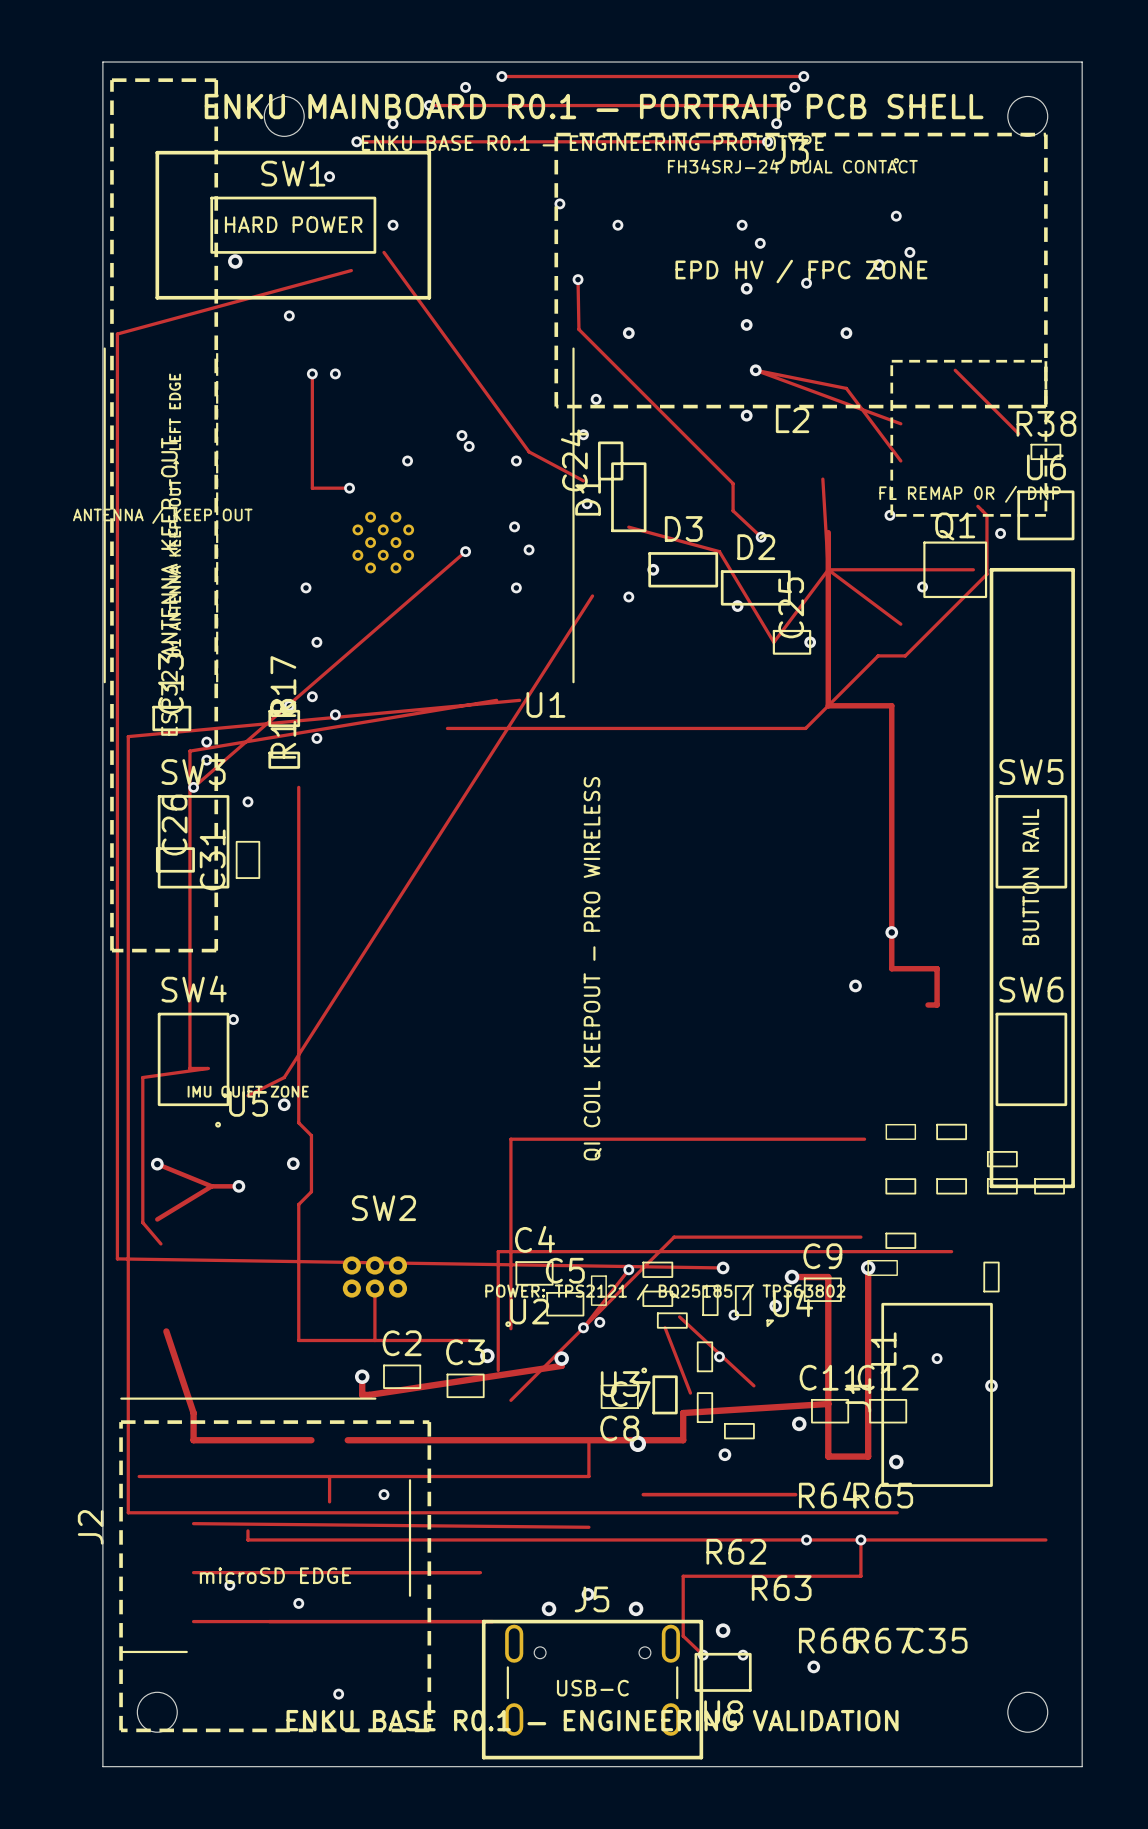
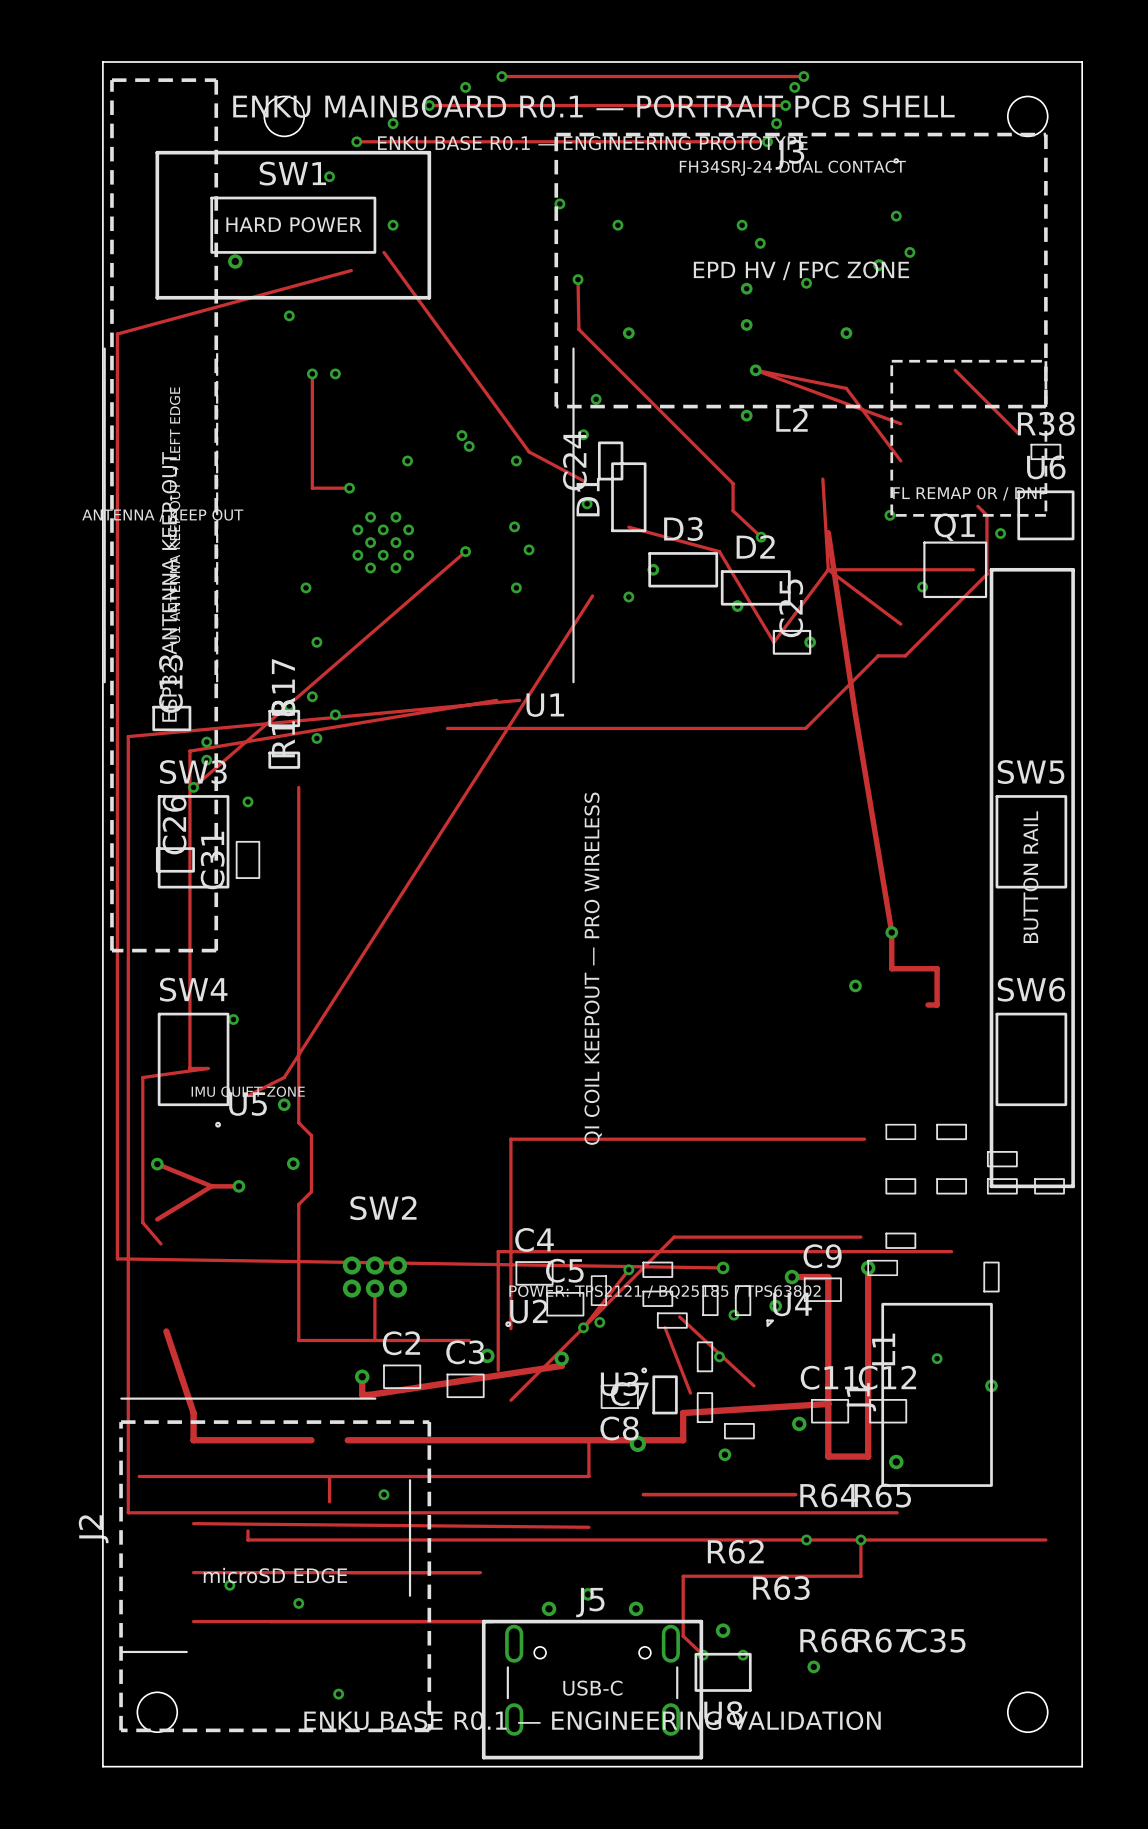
track: (828, 532) (828, 705) (891, 705) (891, 932) -> (828, 532) (855, 714) (891, 932)

